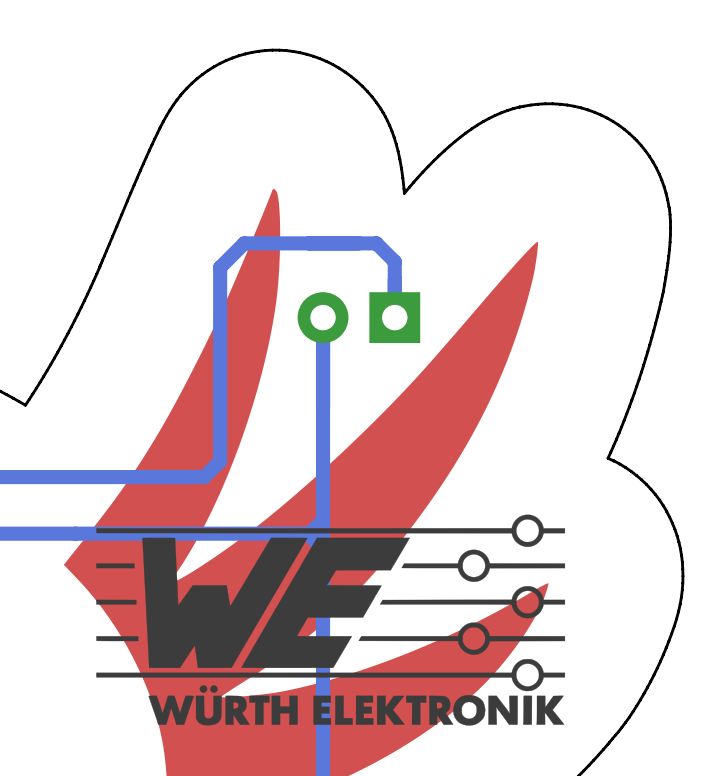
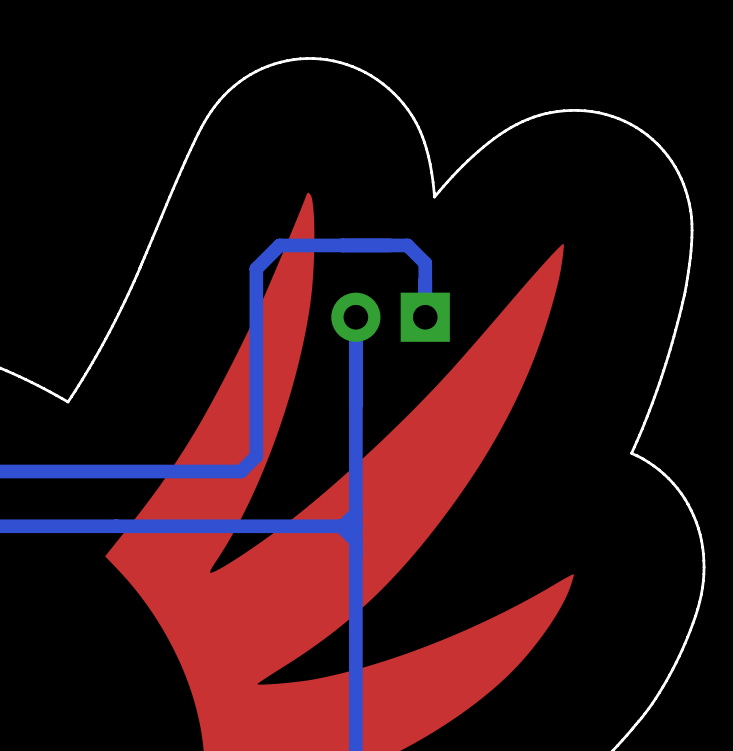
drawing: [96, 514, 566, 726] -> none

